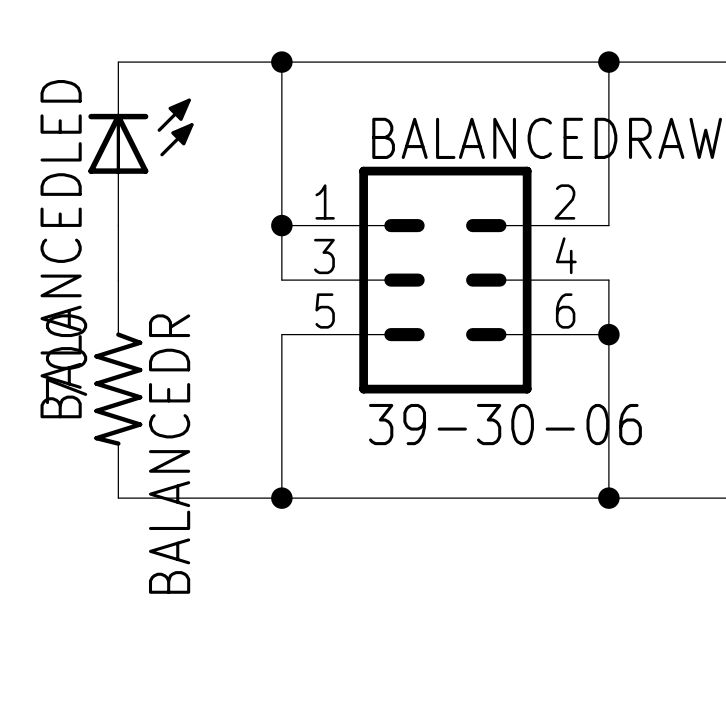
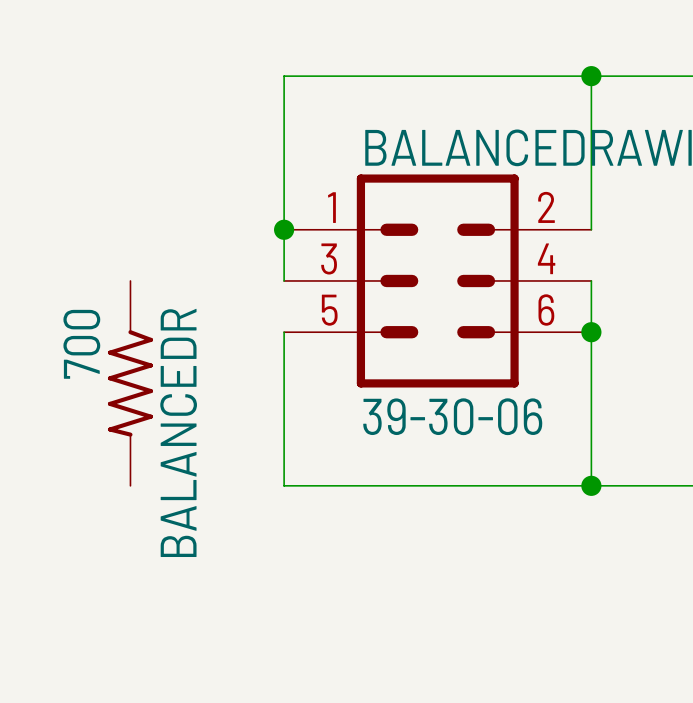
wire: (118, 62) (281, 62) -> none
junction: (281, 62) -> none
BALANCEDLED: (140, 143) -> none
wire: (118, 225) (118, 280) -> none
wire: (118, 498) (281, 498) -> none
junction: (281, 498) -> none

